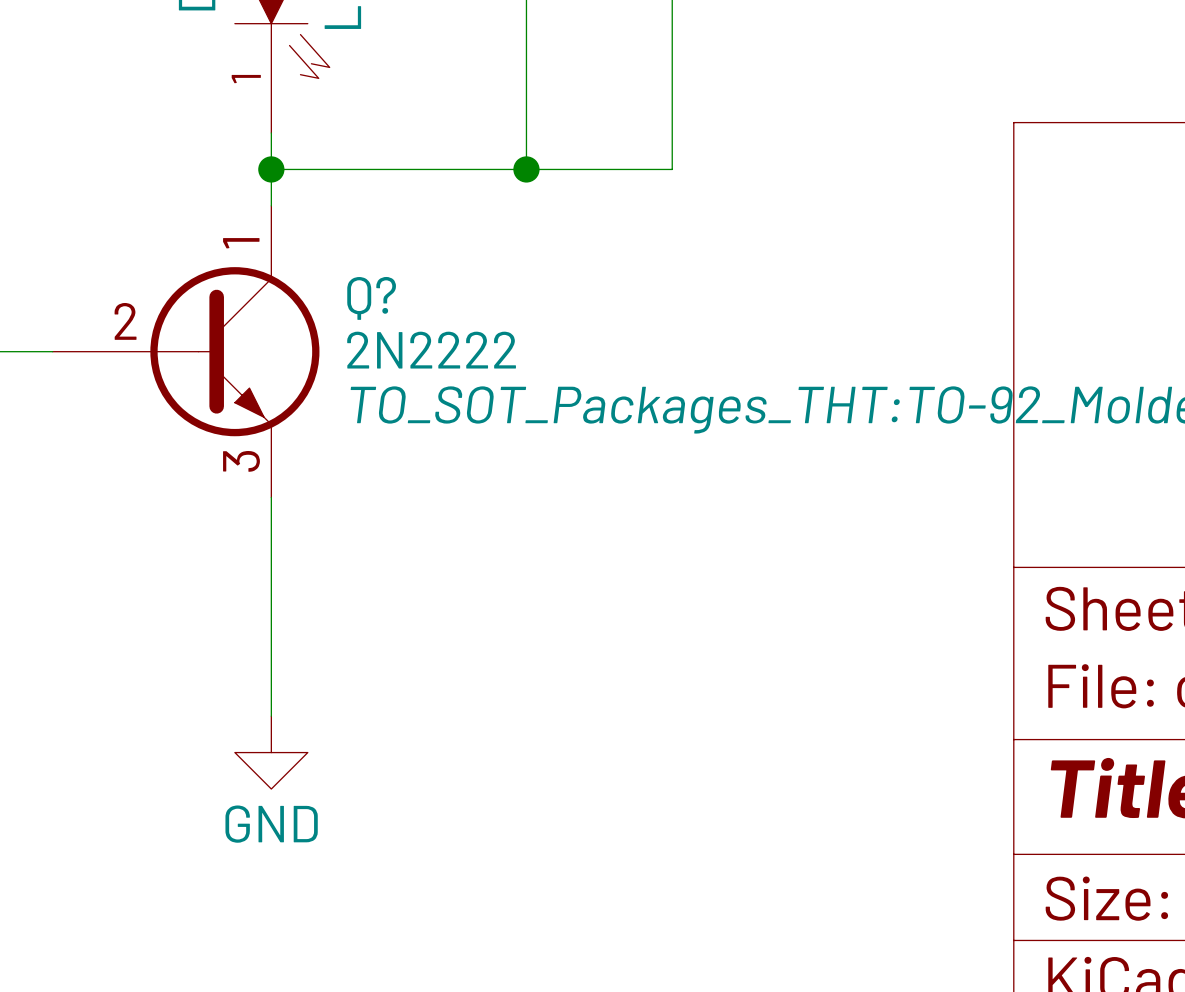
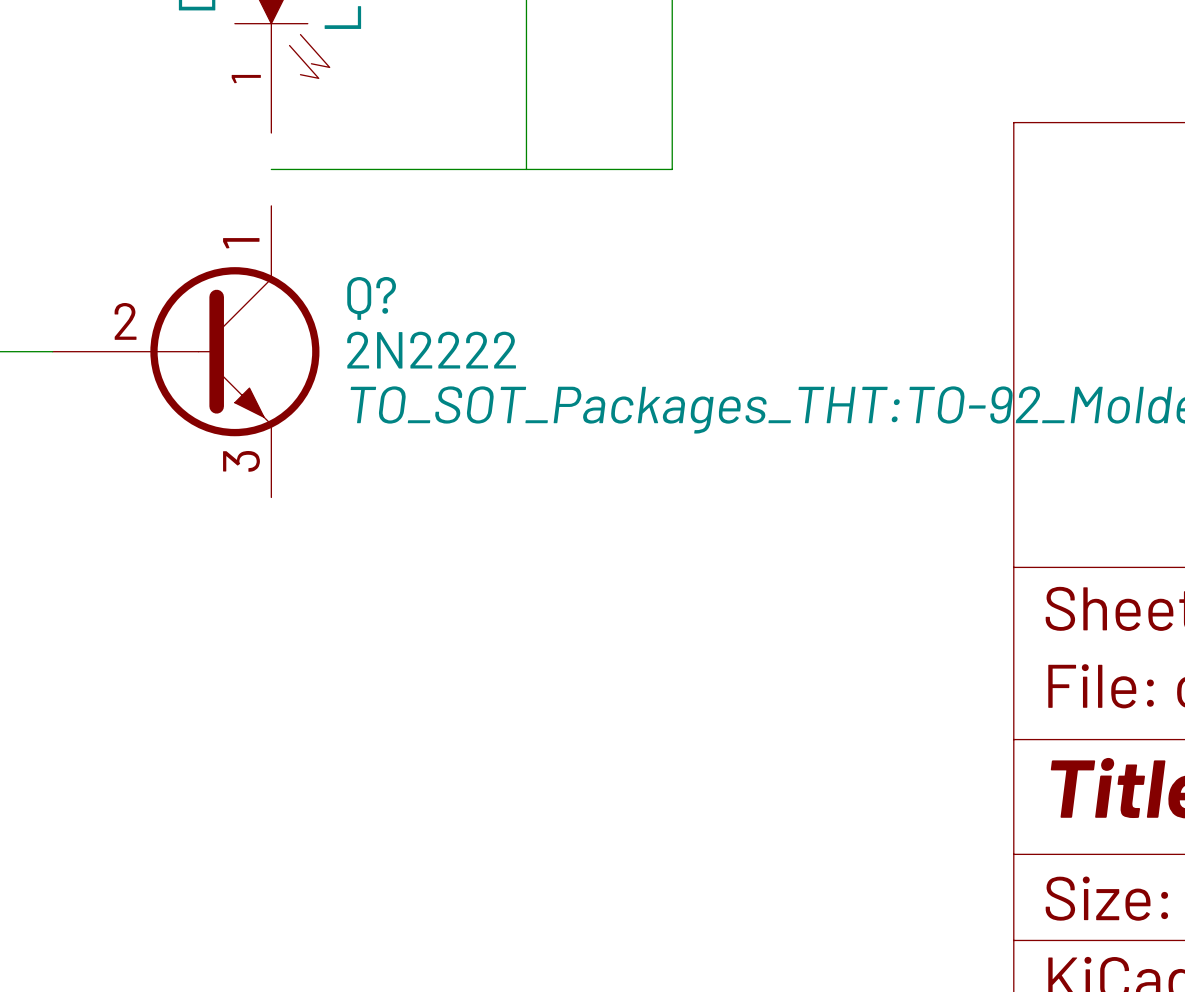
wire: (271, 133) (271, 205) -> none
junction: (271, 169) -> none
junction: (526, 169) -> none
wire: (271, 497) (271, 716) -> none
power symbol: GND (271, 752) -> none

